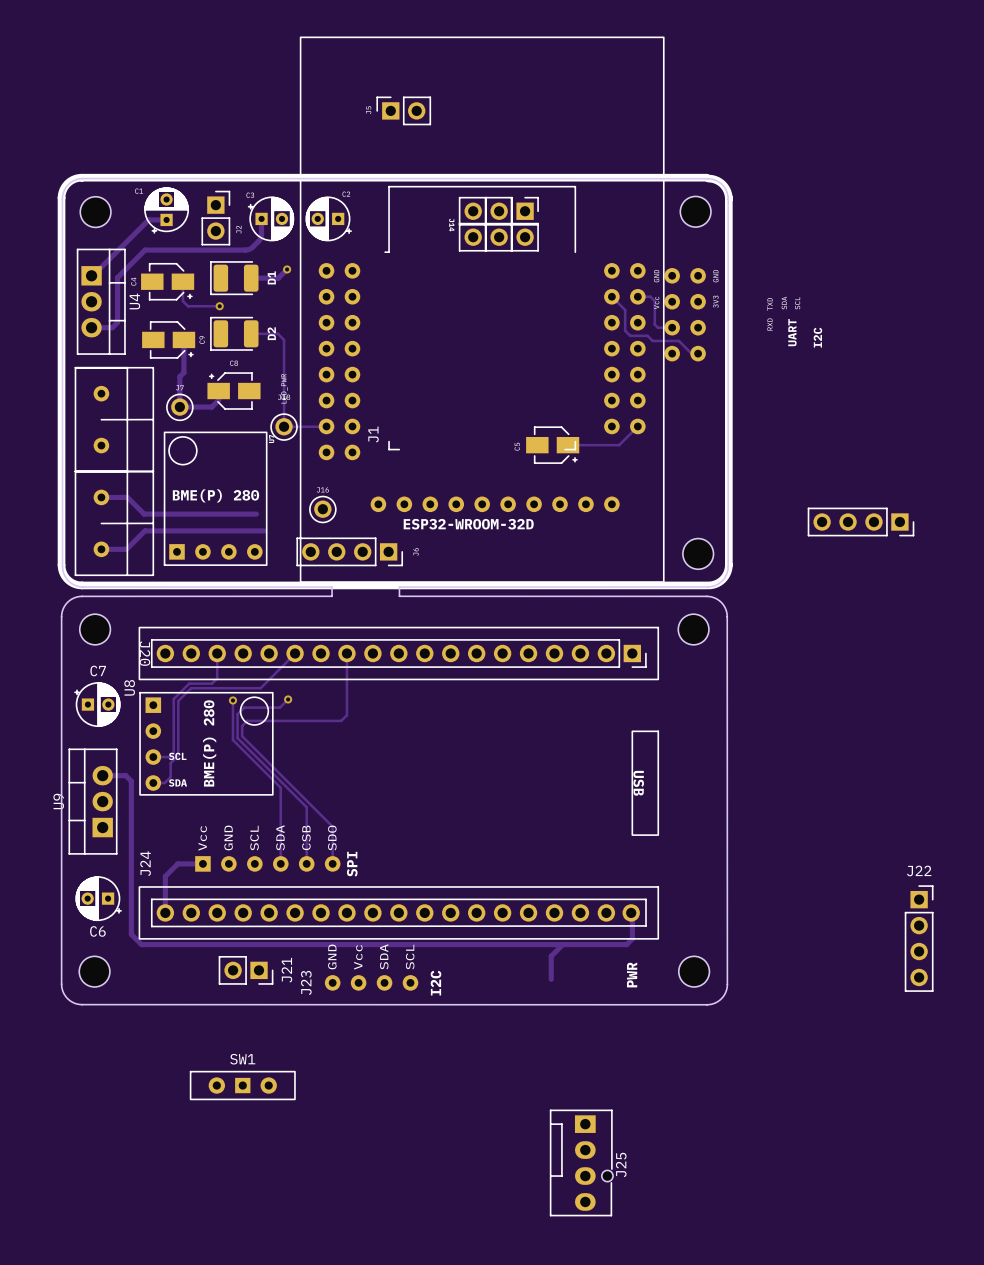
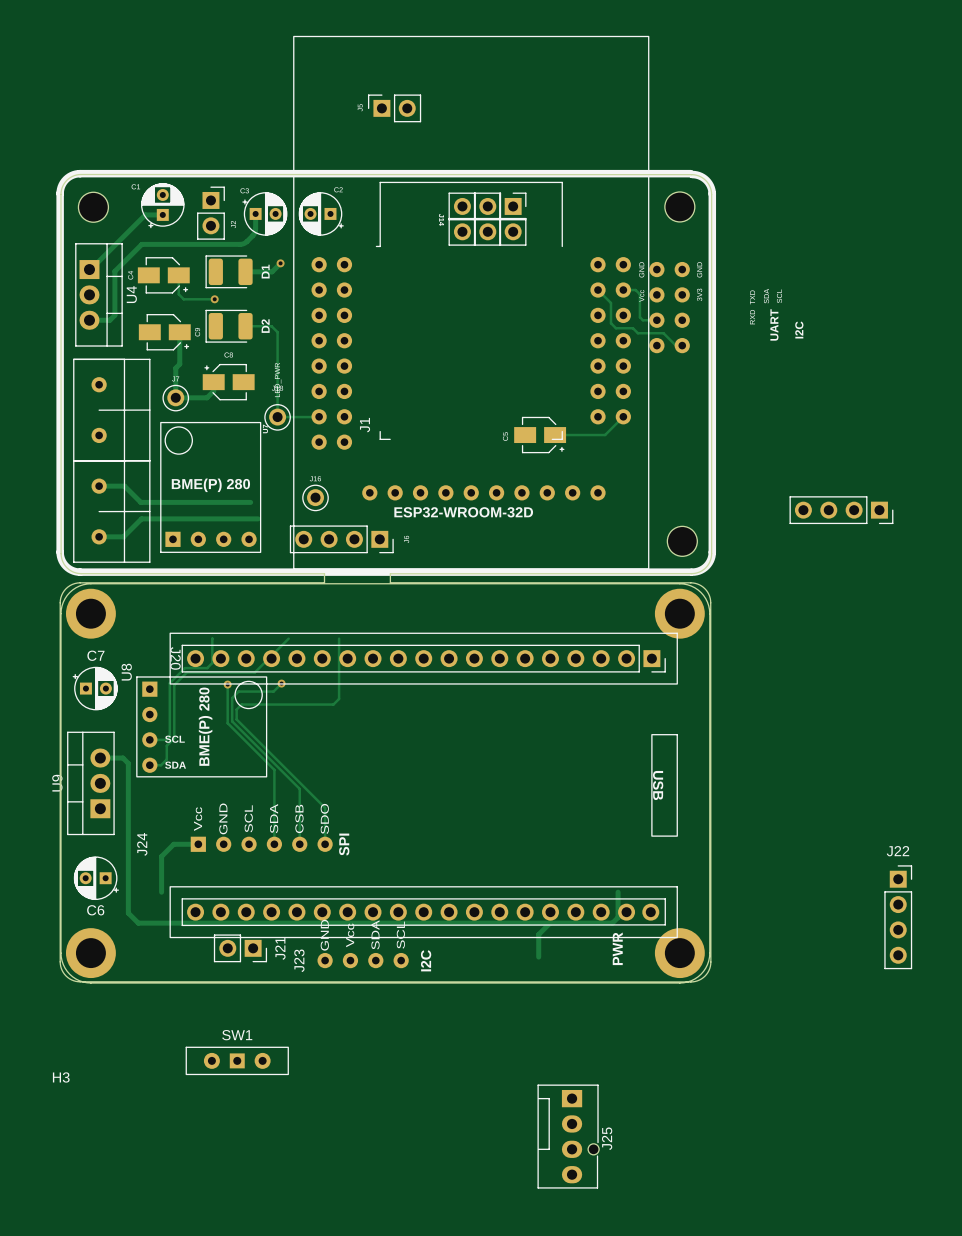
part: (95, 629) -> none
part: (693, 629) -> none
J20 position: (398, 783) -> (423, 785)
H3: none -> (385, 783)
part: (94, 971) -> none
part: (694, 971) -> none

